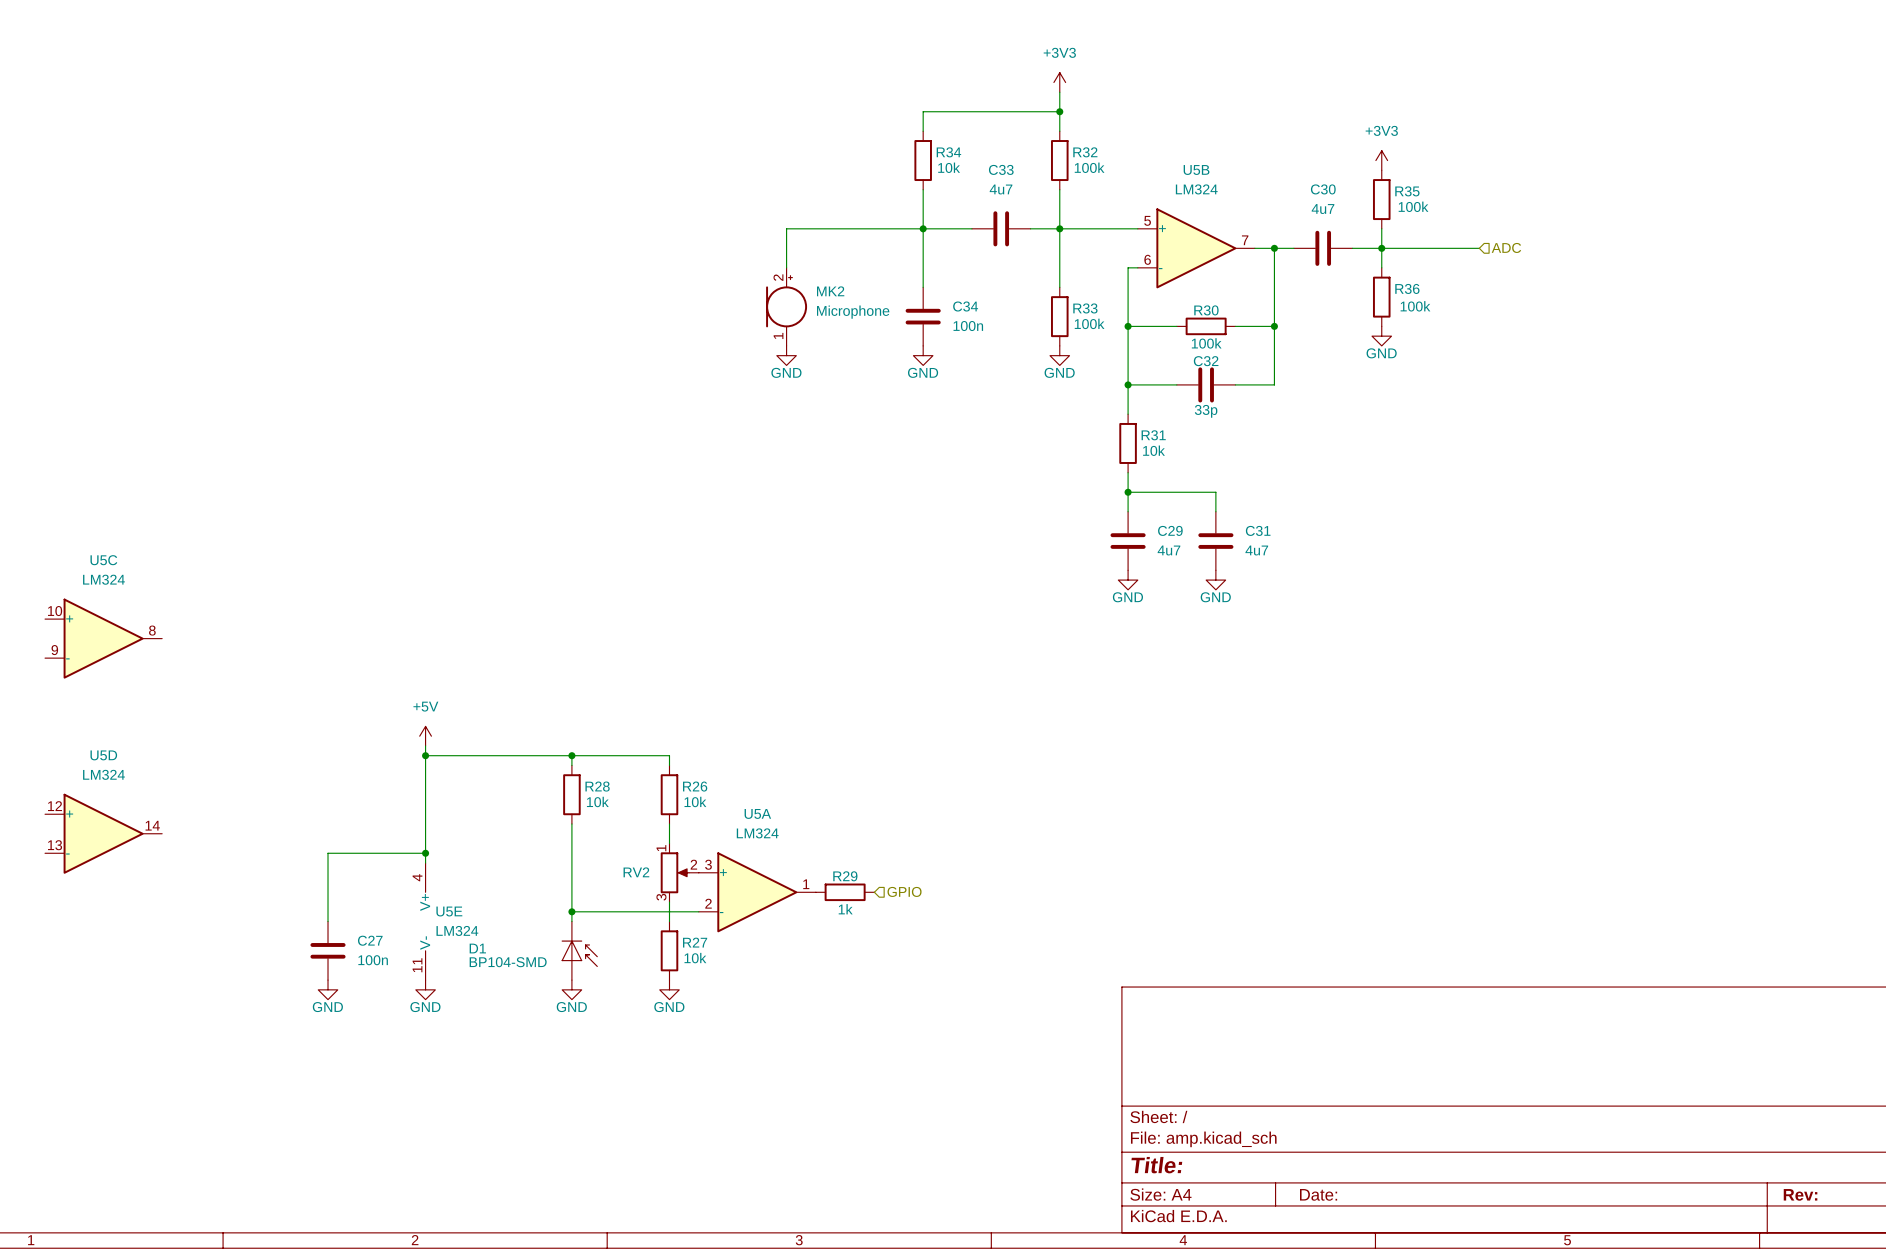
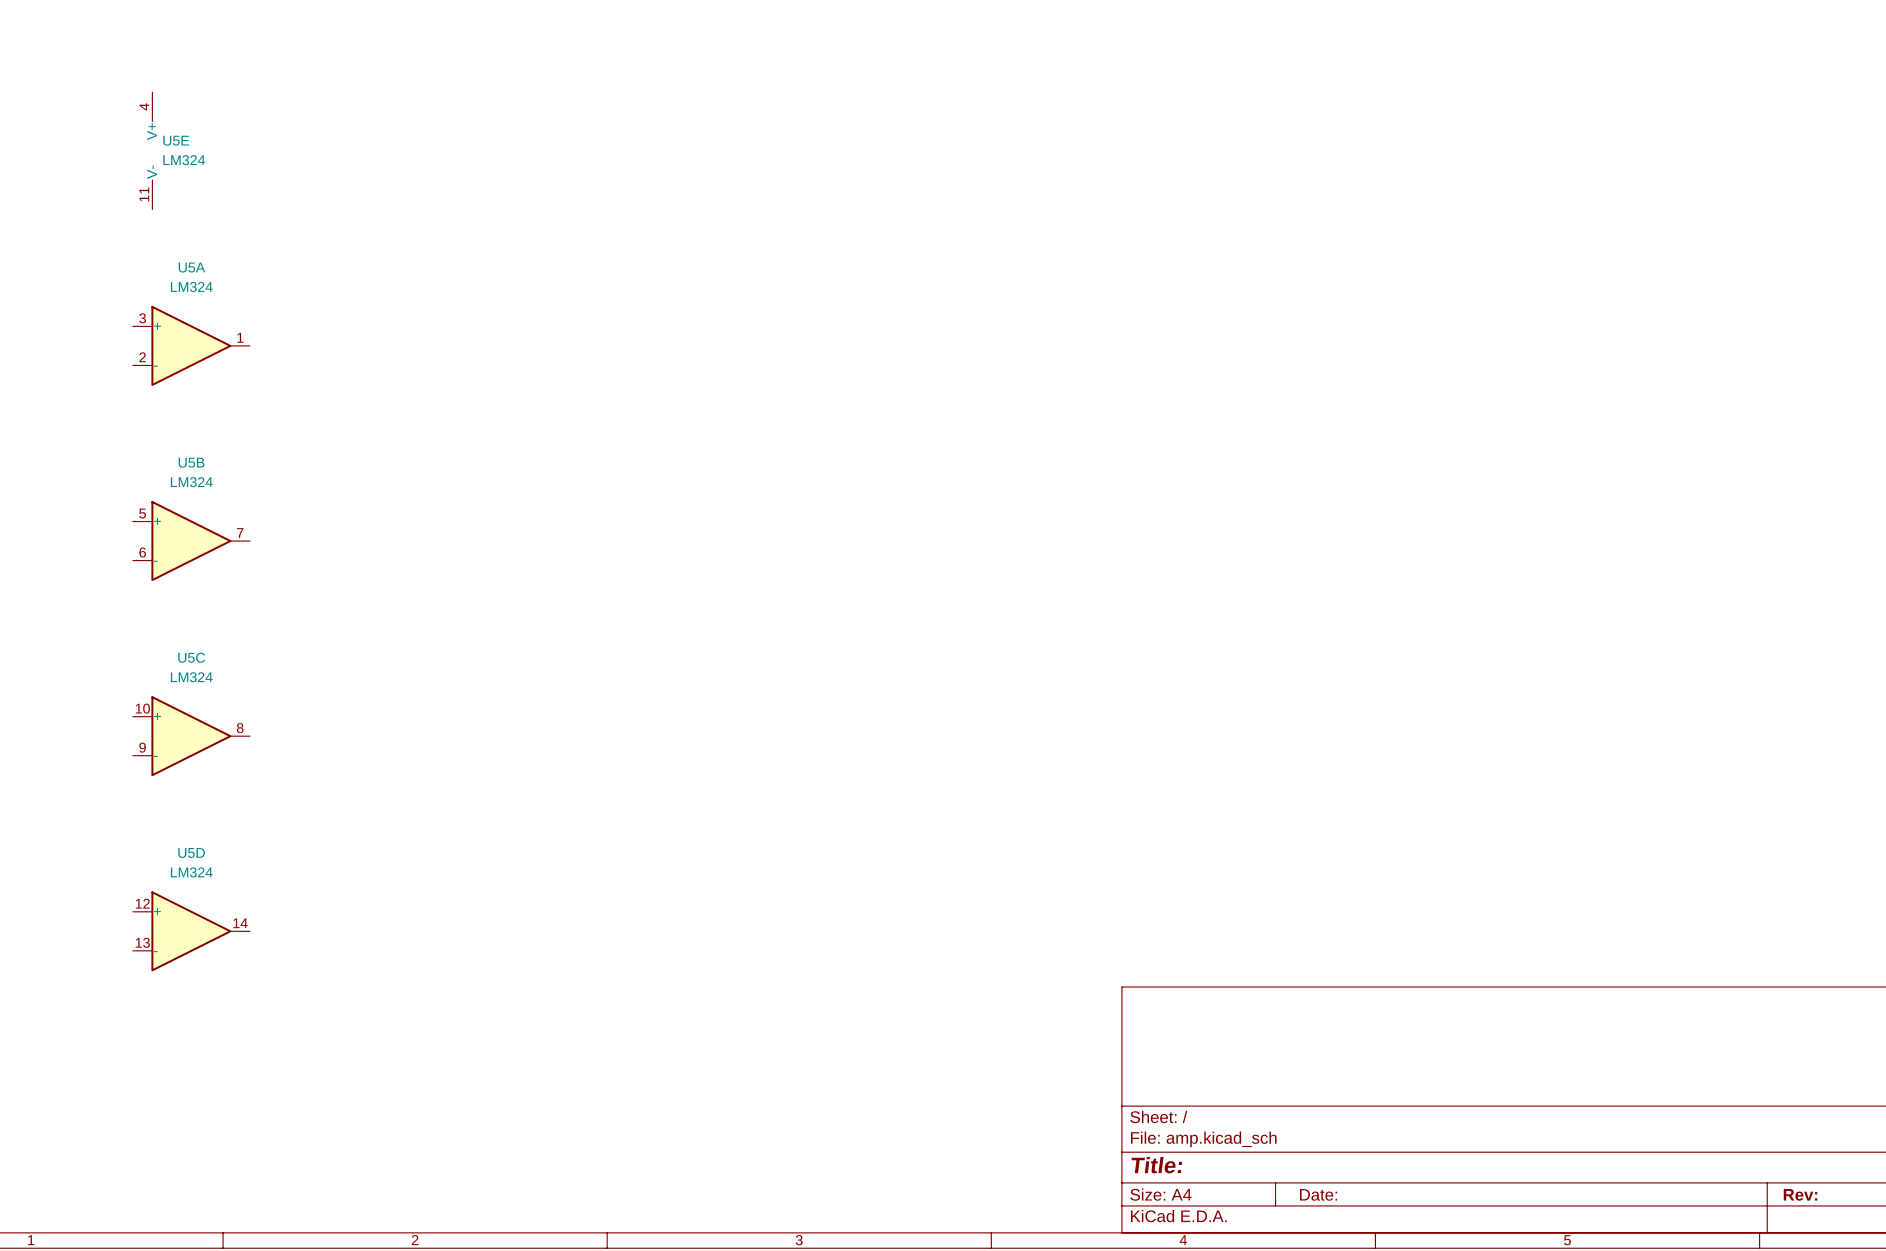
power symbol: +3V3 (1059, 82) -> none
wire: (1059, 92) (1059, 131) -> none
wire: (1059, 111) (923, 111) (923, 131) -> none
junction: (1059, 111) -> none
R34: 10k (923, 160) -> none
R32: 100k (1059, 160) -> none
power symbol: +3V3 (1381, 160) -> none
wire: (923, 189) (923, 287) -> none
wire: (1059, 189) (1059, 287) -> none
R35: 100k (1381, 199) -> none
junction: (923, 228) -> none
wire: (971, 228) (786, 228) (786, 267) -> none
C33: 4u7 (1001, 228) -> none
wire: (1030, 228) (1137, 228) -> none
junction: (1059, 228) -> none
wire: (1381, 228) (1381, 267) -> none
hierarchical label: ADC (1506, 247) -> none
U5B position: (1196, 248) -> (191, 541)
wire: (1254, 248) (1293, 248) -> none
wire: (1274, 248) (1274, 384) (1235, 384) -> none
junction: (1274, 248) -> none
C30: 4u7 (1323, 248) -> none
wire: (1352, 248) (1479, 248) -> none
junction: (1381, 248) -> none
wire: (1137, 267) (1128, 267) (1128, 414) -> none
R36: 100k (1381, 297) -> none
MK2: Microphone (786, 306) -> none
C34: 100n (923, 316) -> none
R33: 100k (1059, 316) -> none
wire: (1128, 326) (1176, 326) -> none
junction: (1128, 326) -> none
R30: 100k (1206, 326) -> none
wire: (1235, 326) (1274, 326) -> none
junction: (1274, 326) -> none
power symbol: GND (1381, 336) -> none
power symbol: GND (786, 355) -> none
power symbol: GND (923, 355) -> none
power symbol: GND (1059, 355) -> none
wire: (1128, 384) (1176, 384) -> none
junction: (1128, 384) -> none
C32: 33p (1206, 384) -> none
R31: 10k (1128, 443) -> none
wire: (1128, 472) (1128, 511) -> none
wire: (1128, 492) (1215, 492) (1215, 511) -> none
junction: (1128, 492) -> none
C29: 4u7 (1128, 541) -> none
C31: 4u7 (1215, 541) -> none
power symbol: GND (1128, 580) -> none
power symbol: GND (1215, 580) -> none
U5C position: (103, 638) -> (191, 736)
power symbol: +5V (425, 736) -> none
wire: (425, 745) (425, 863) -> none
wire: (425, 755) (669, 755) (669, 765) -> none
junction: (425, 755) -> none
wire: (571, 755) (571, 765) -> none
junction: (571, 755) -> none
R28: 10k (571, 794) -> none
R26: 10k (669, 794) -> none
wire: (571, 823) (571, 921) -> none
wire: (669, 823) (669, 843) -> none
U5D position: (103, 833) -> (191, 931)
wire: (425, 853) (328, 853) (328, 921) -> none
junction: (425, 853) -> none
RV2: (679, 872) -> none
hierarchical label: GPIO (904, 891) -> none
U5A position: (757, 892) -> (191, 345)
R29: 1k (845, 892) -> none
wire: (669, 902) (669, 921) -> none
wire: (571, 911) (698, 911) -> none
junction: (571, 911) -> none
U5E position: (425, 921) -> (152, 150)
C27: 100n (328, 950) -> none
D1: BP104-SMD (579, 950) -> none
R27: 10k (669, 950) -> none
power symbol: GND (328, 989) -> none
power symbol: GND (425, 989) -> none
power symbol: GND (571, 989) -> none
power symbol: GND (669, 989) -> none

